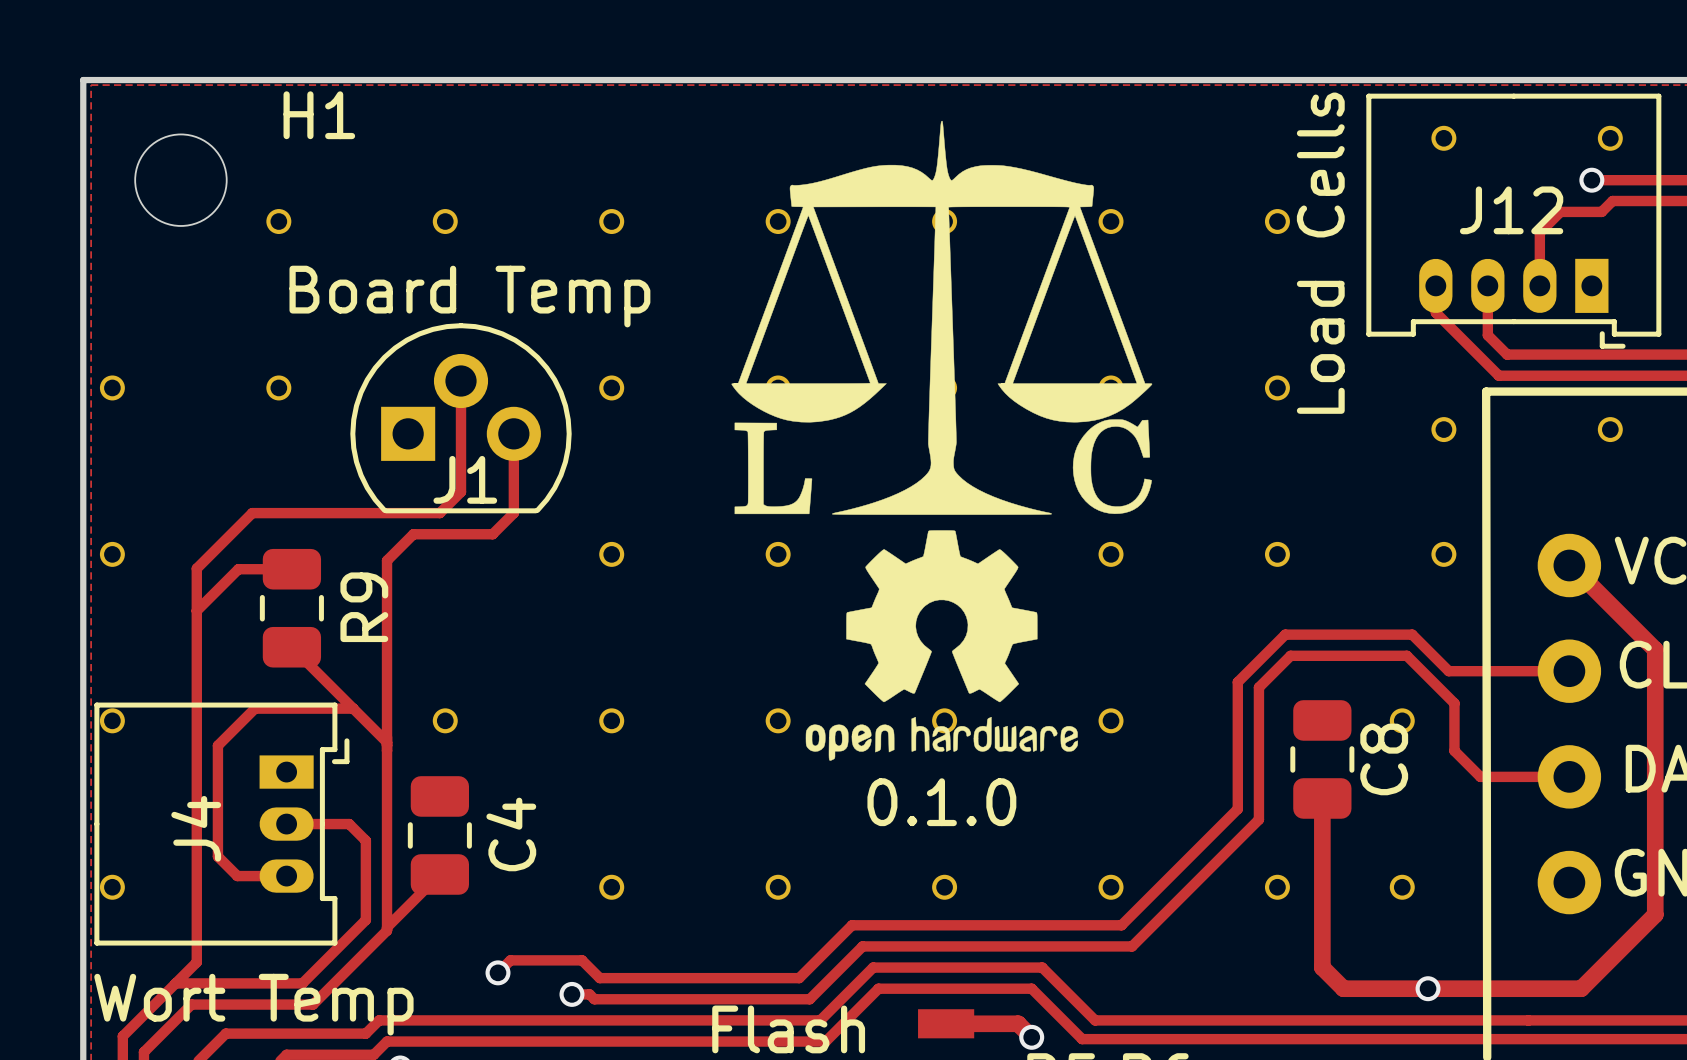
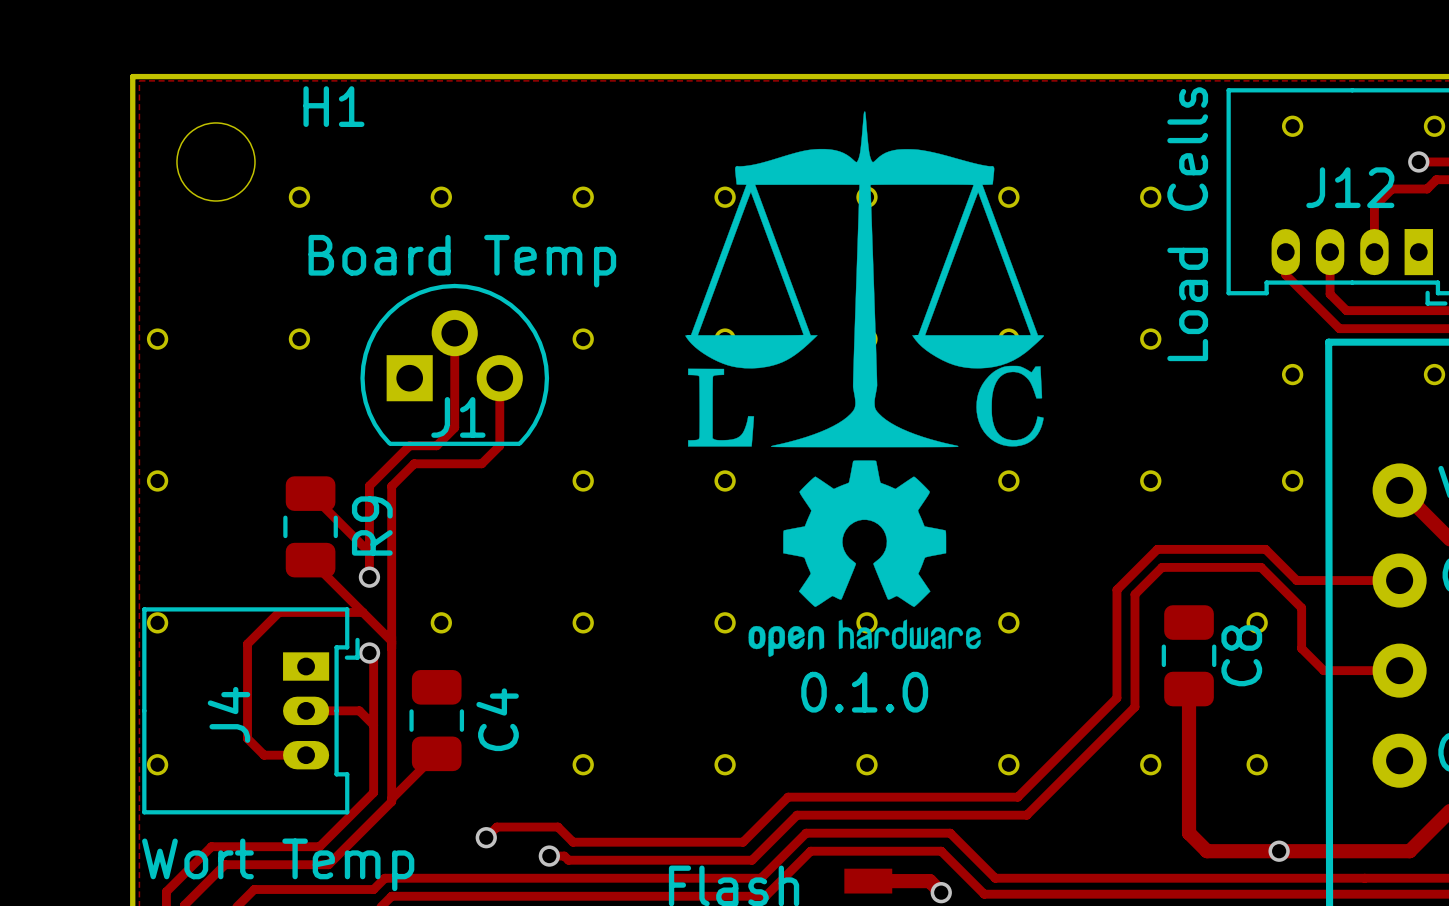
track: (408, 513) (252, 513) (196, 568) (196, 962) (175, 983) -> (409, 445) (369, 485) (369, 577)
track: (291, 569) (238, 569) (196, 610) -> (310, 493) (369, 552)
via: none -> (369, 577)
track: none -> (369, 653) (373, 657) (373, 725)
via: none -> (369, 653)

